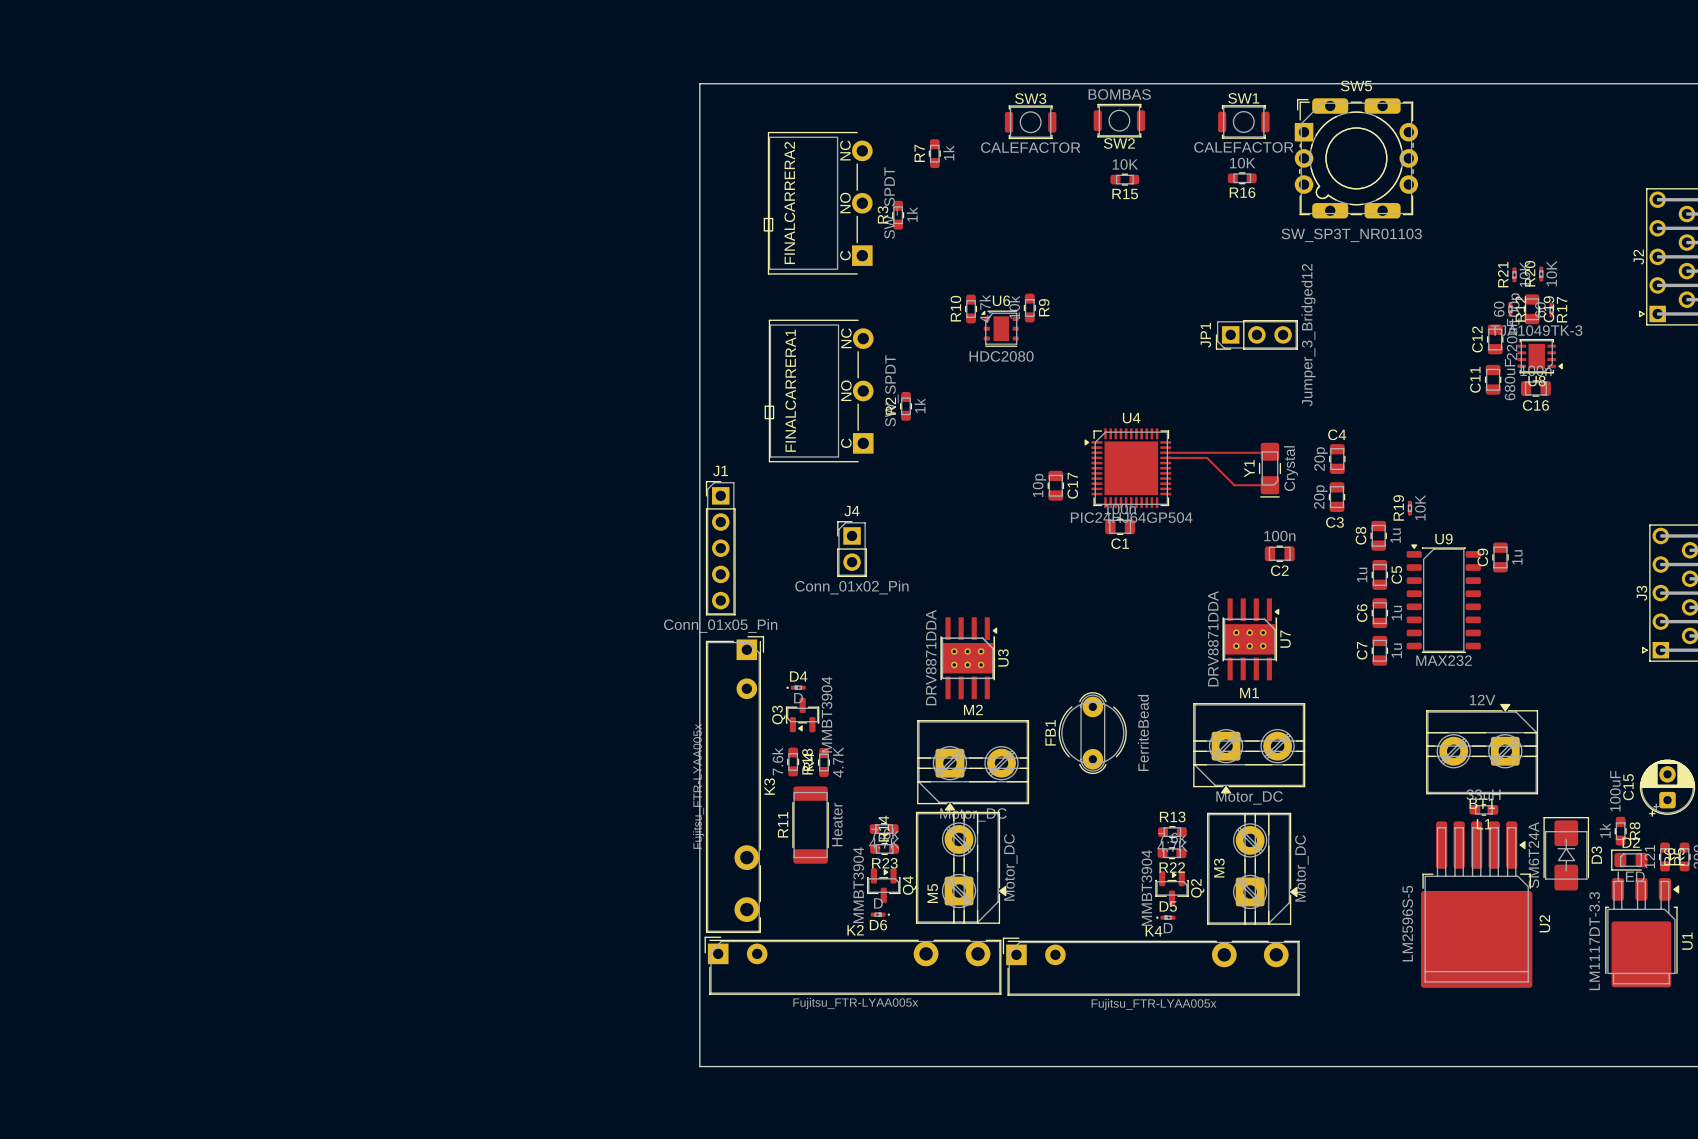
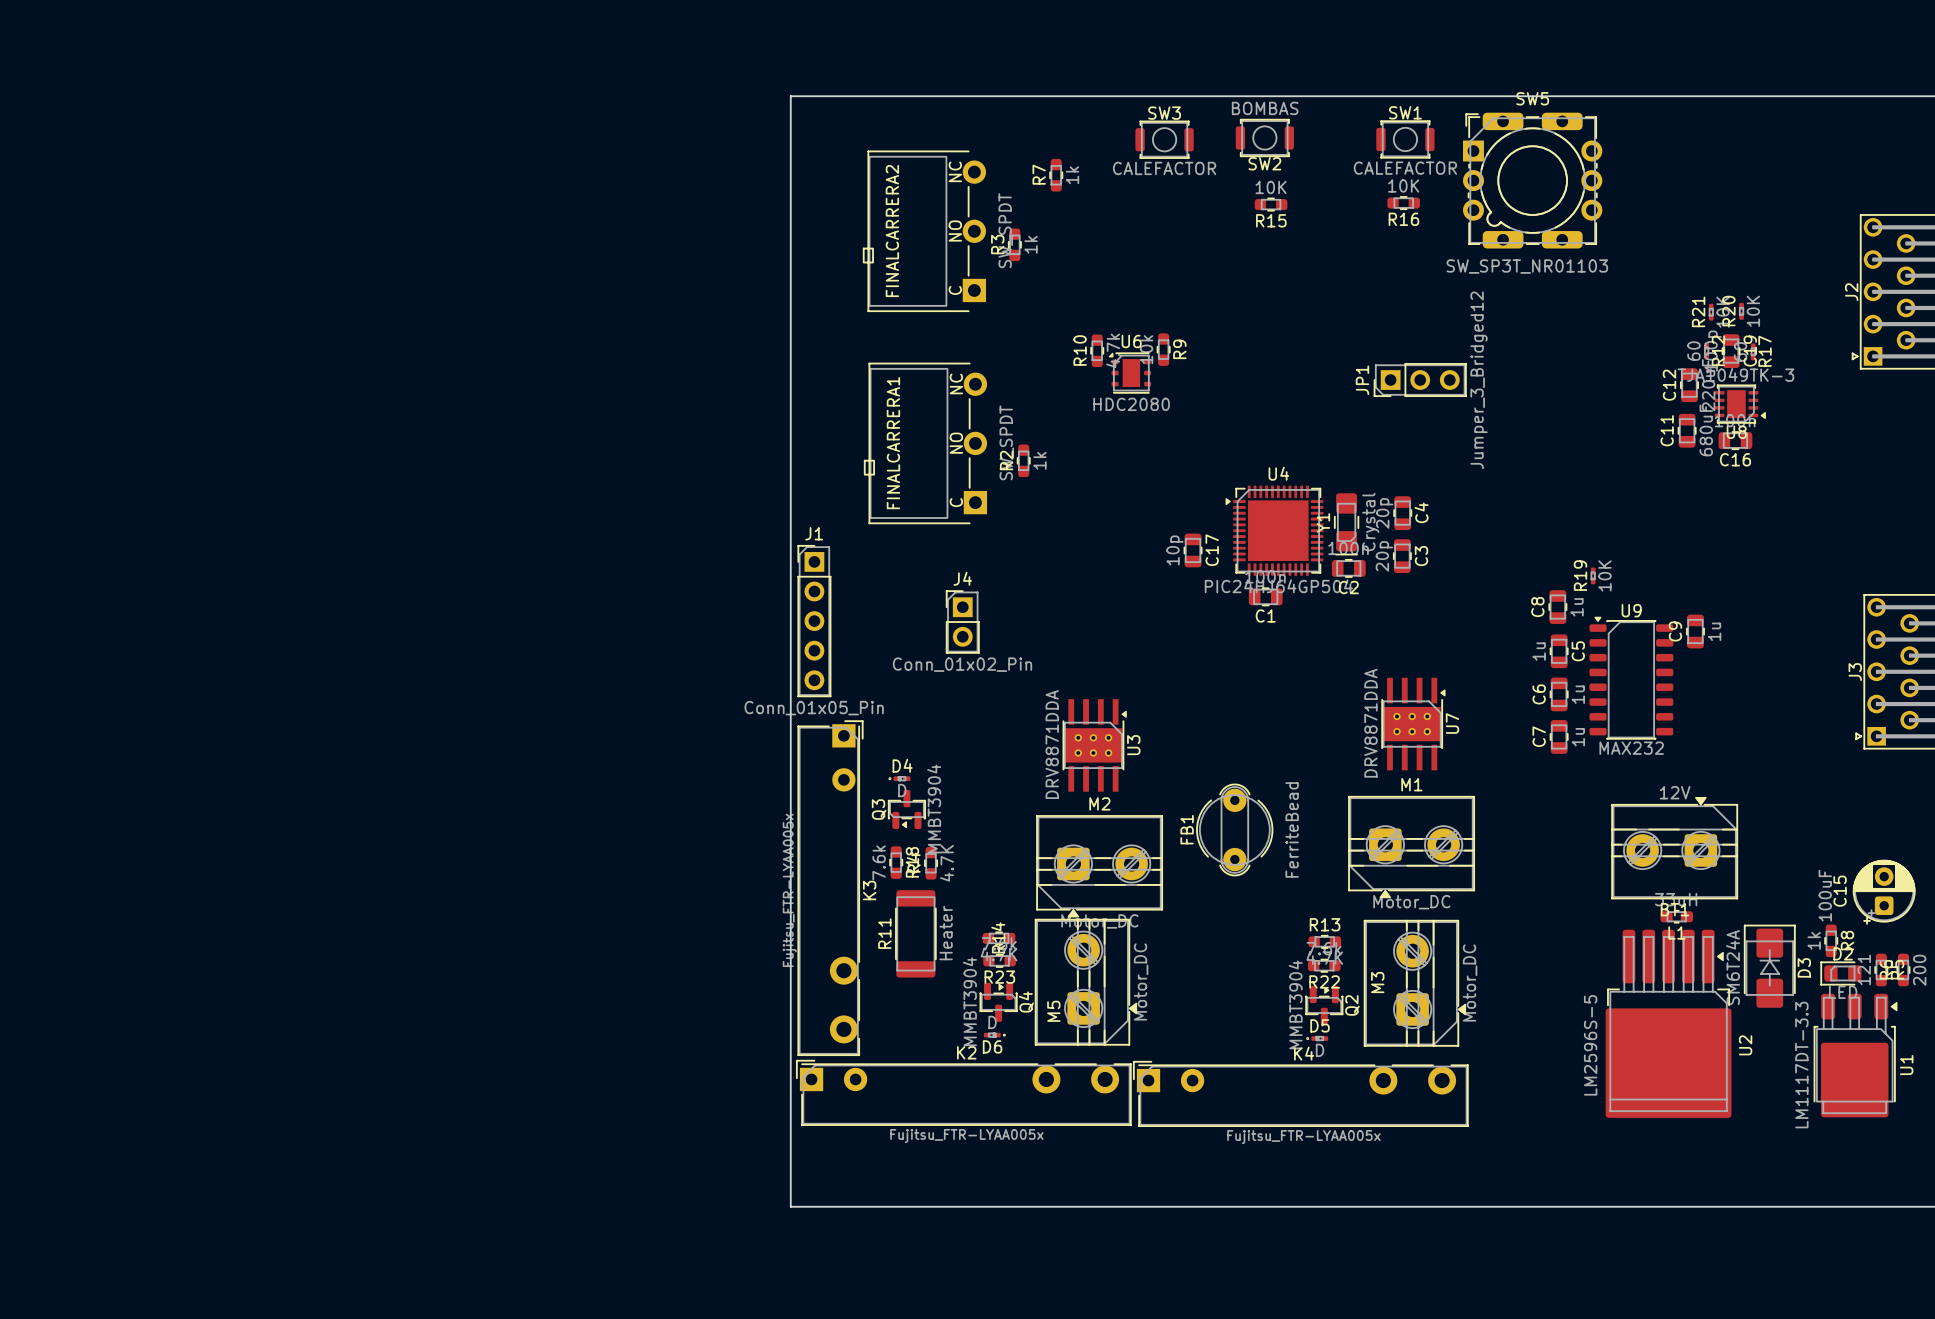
C4 name rotation: 0° (1337, 434) -> 90° counterclockwise (1421, 512)
C4 name position: C4 (1337, 434) -> C4 (1421, 512)
track: (1269, 451) (1165, 452) -> none
track: (1165, 457) (1207, 457) (1234, 485) (1269, 485) -> none
C4 position: (1337, 459) -> (1402, 513)
Y1 position: (1269, 470) -> (1346, 524)
C3 position: (1336, 497) -> (1402, 556)
C3 name rotation: 0° (1334, 522) -> 90° counterclockwise (1421, 556)
C3 name position: C3 (1334, 522) -> C3 (1421, 556)
C2 position: (1279, 553) -> (1348, 568)

